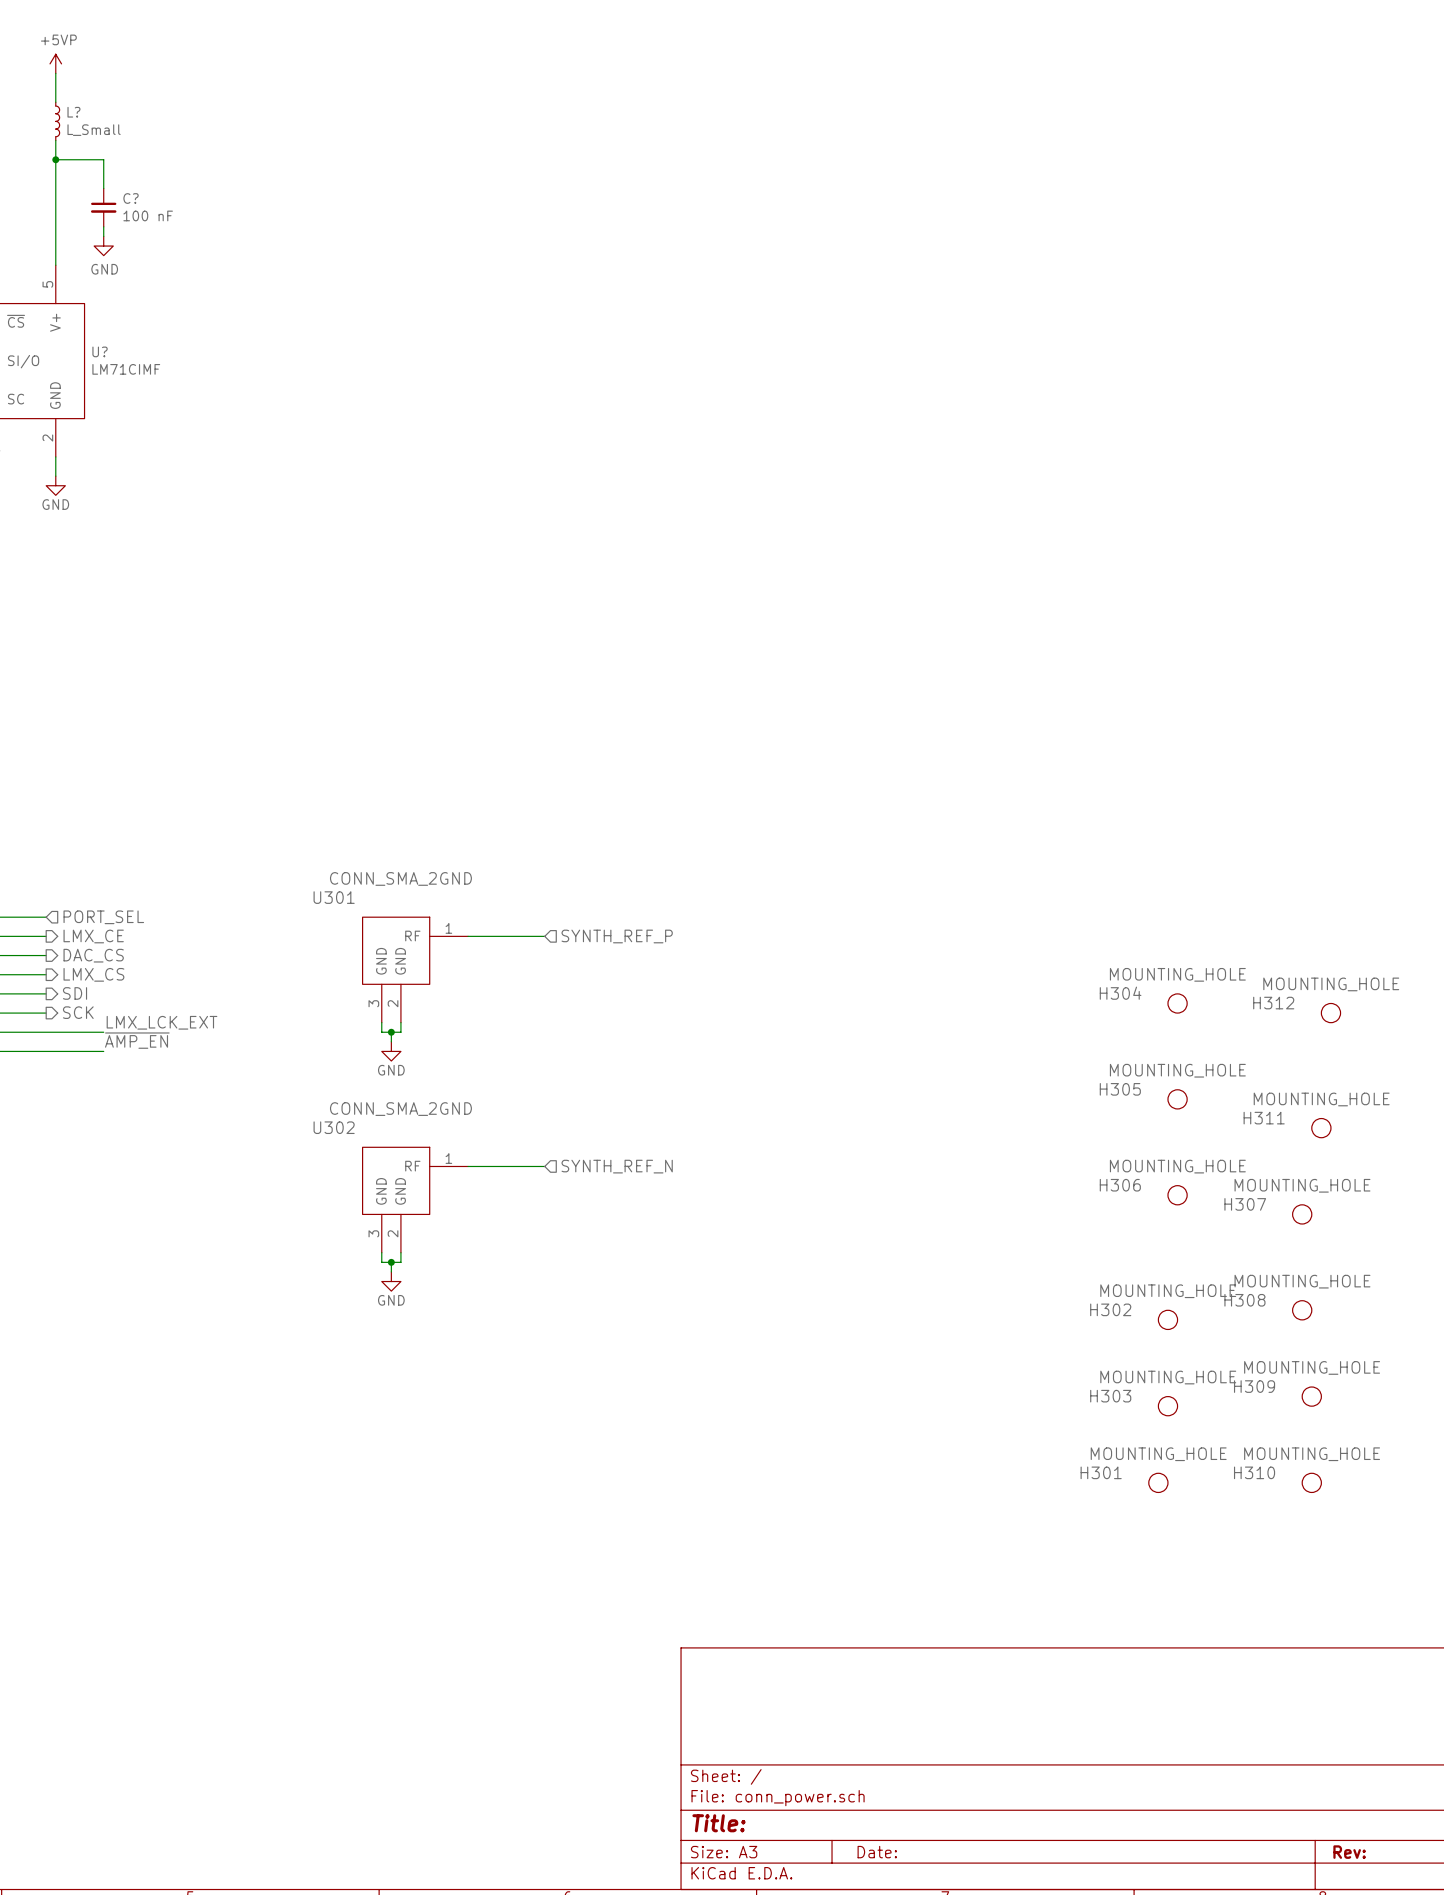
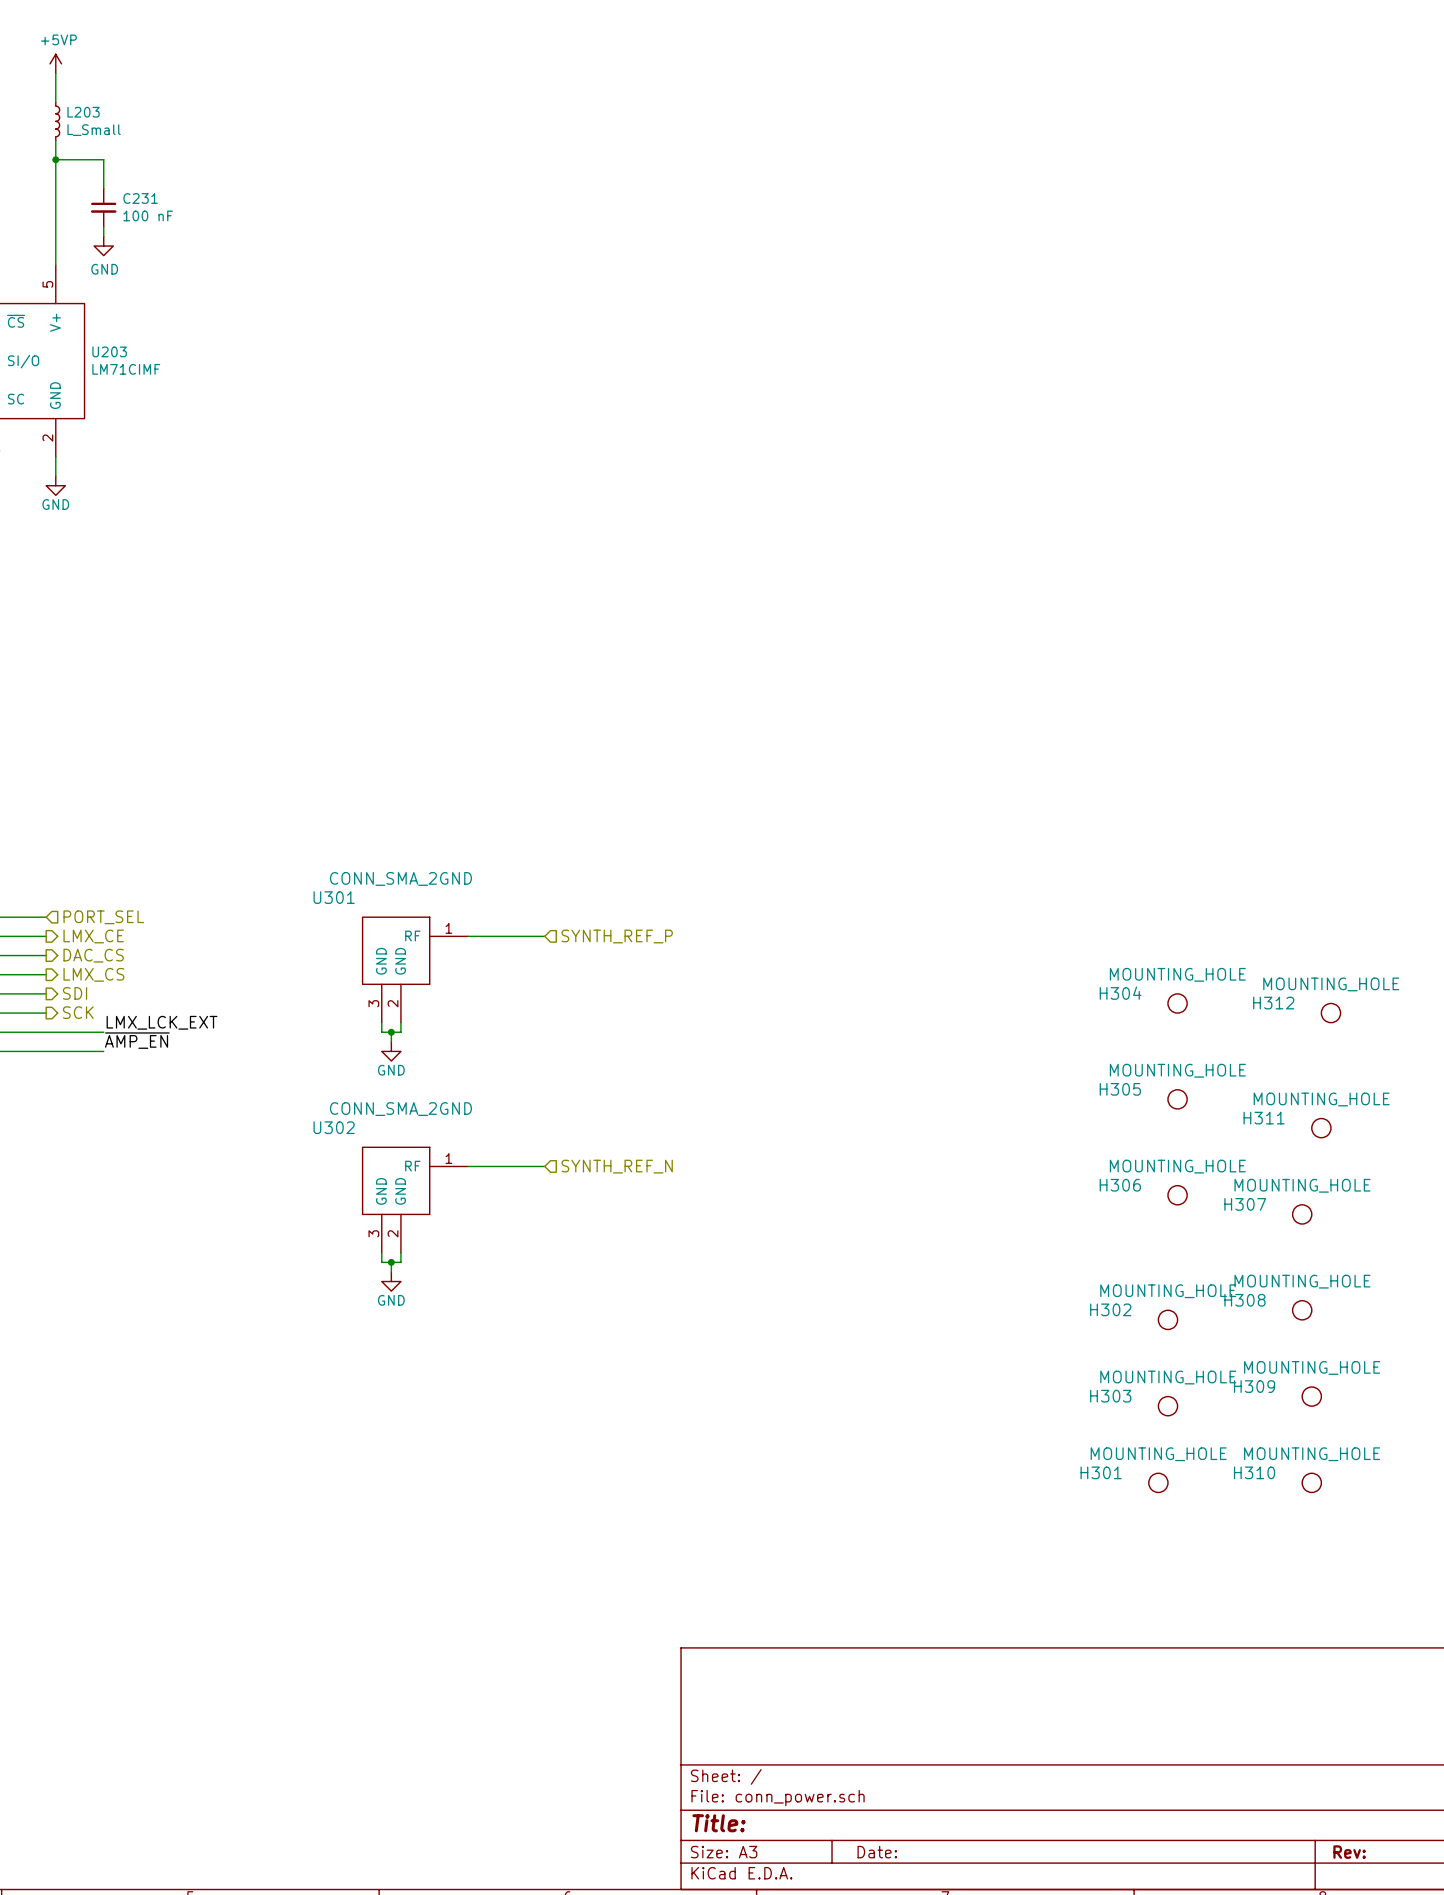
L? name: L? (73, 112) -> L203 (83, 112)
C? name: C? (131, 198) -> C231 (140, 198)
U? name: U? (100, 351) -> U203 (109, 351)

